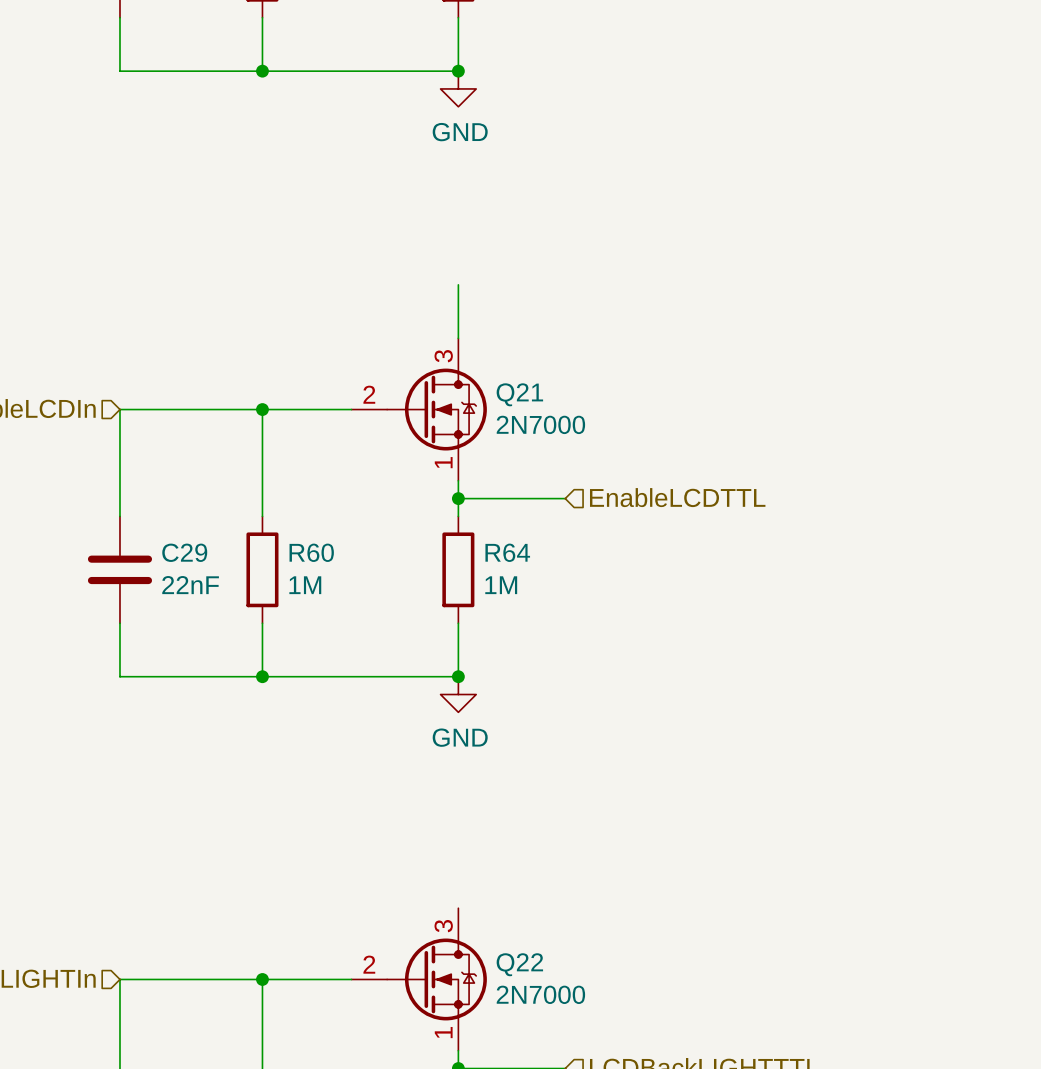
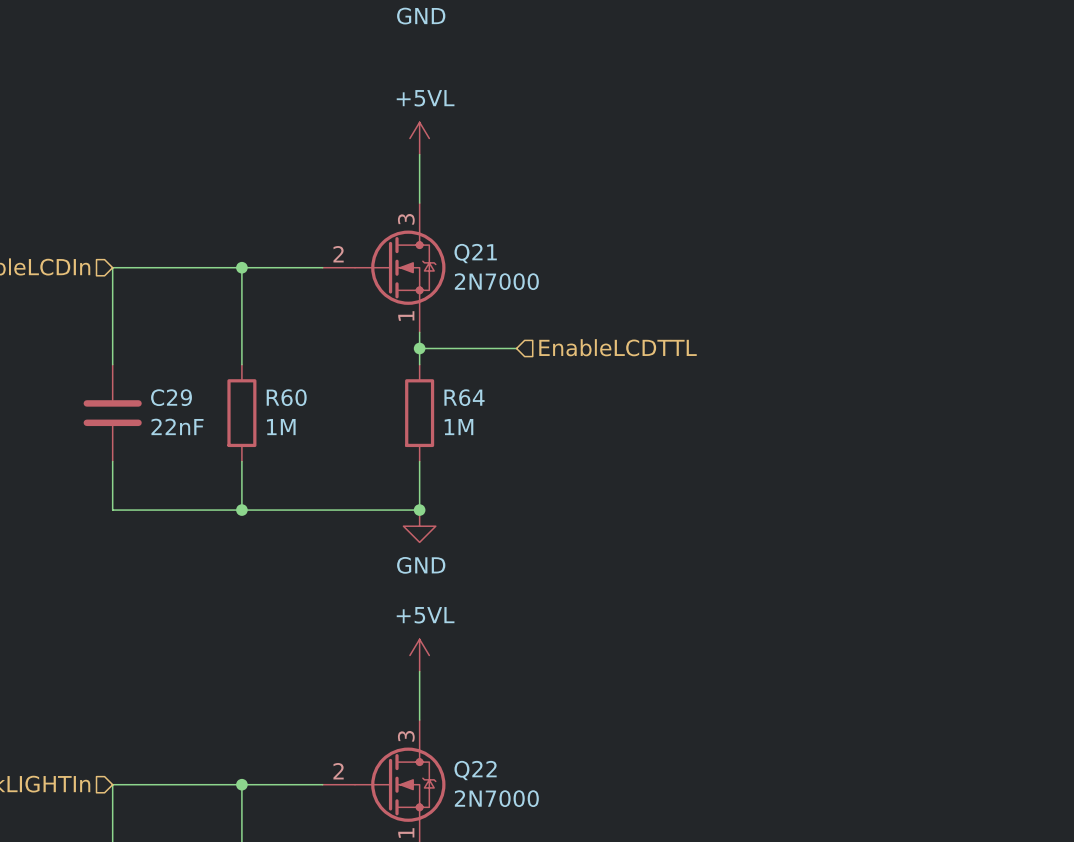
power symbol: none -> +5VL (419, 138)
power symbol: none -> +5VL (419, 655)
wire: none -> (419, 671) (419, 720)

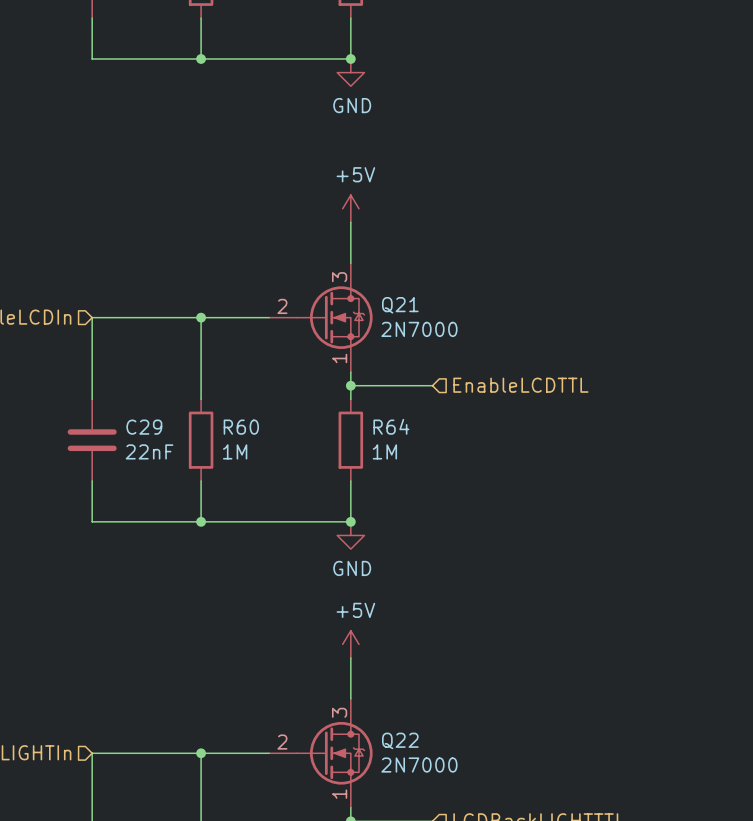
power symbol: +5VL (419, 138) -> +5V (350, 208)
power symbol: +5VL (419, 655) -> +5V (350, 644)

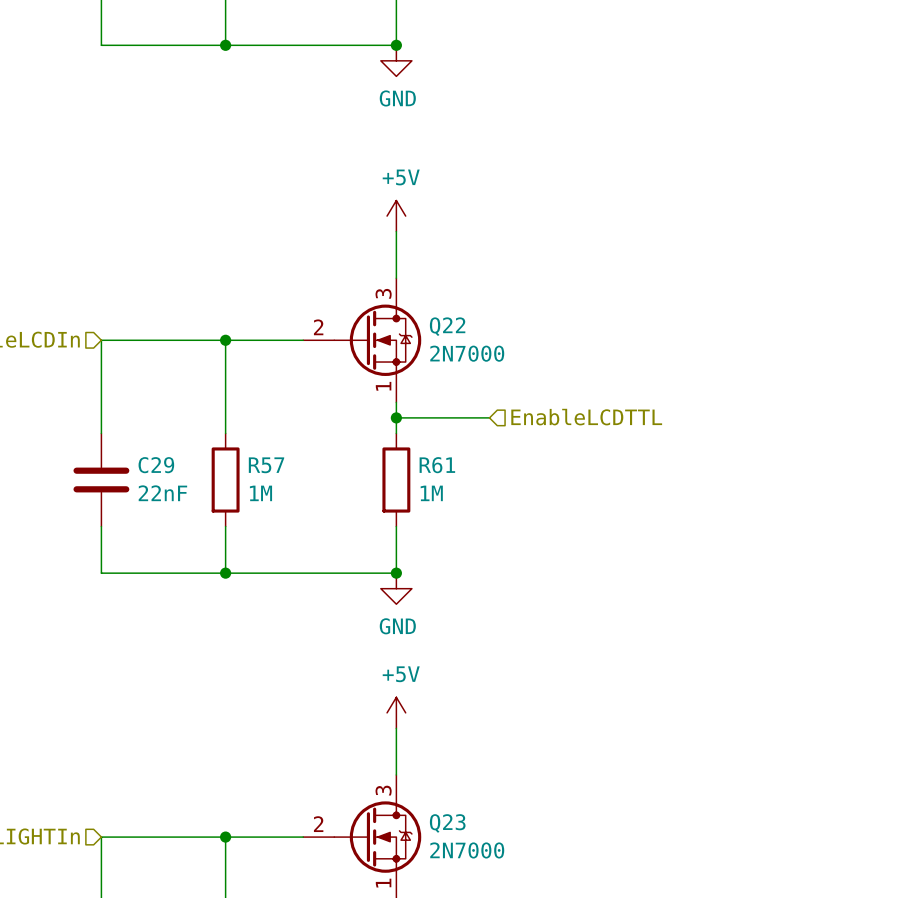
Q21 name: Q21 (400, 305) -> Q22 (447, 326)
R64 name: R64 (391, 426) -> R61 (437, 465)
R60 name: R60 (241, 427) -> R57 (266, 465)
Q22 name: Q22 (400, 740) -> Q23 (447, 823)

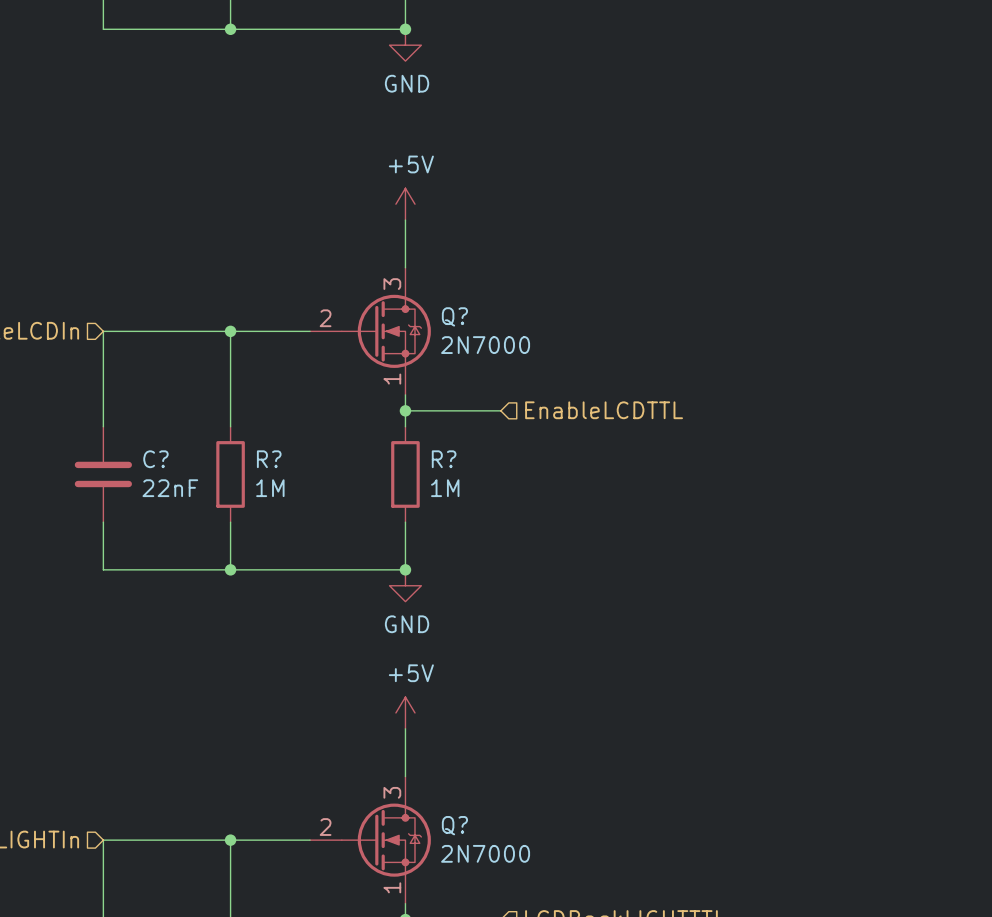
Q22 name: Q22 (447, 326) -> Q? (454, 316)
C29 name: C29 (156, 465) -> C? (155, 459)
R57 name: R57 (266, 465) -> R? (269, 459)
R61 name: R61 (437, 465) -> R? (444, 459)
Q23 name: Q23 (447, 823) -> Q? (454, 825)

